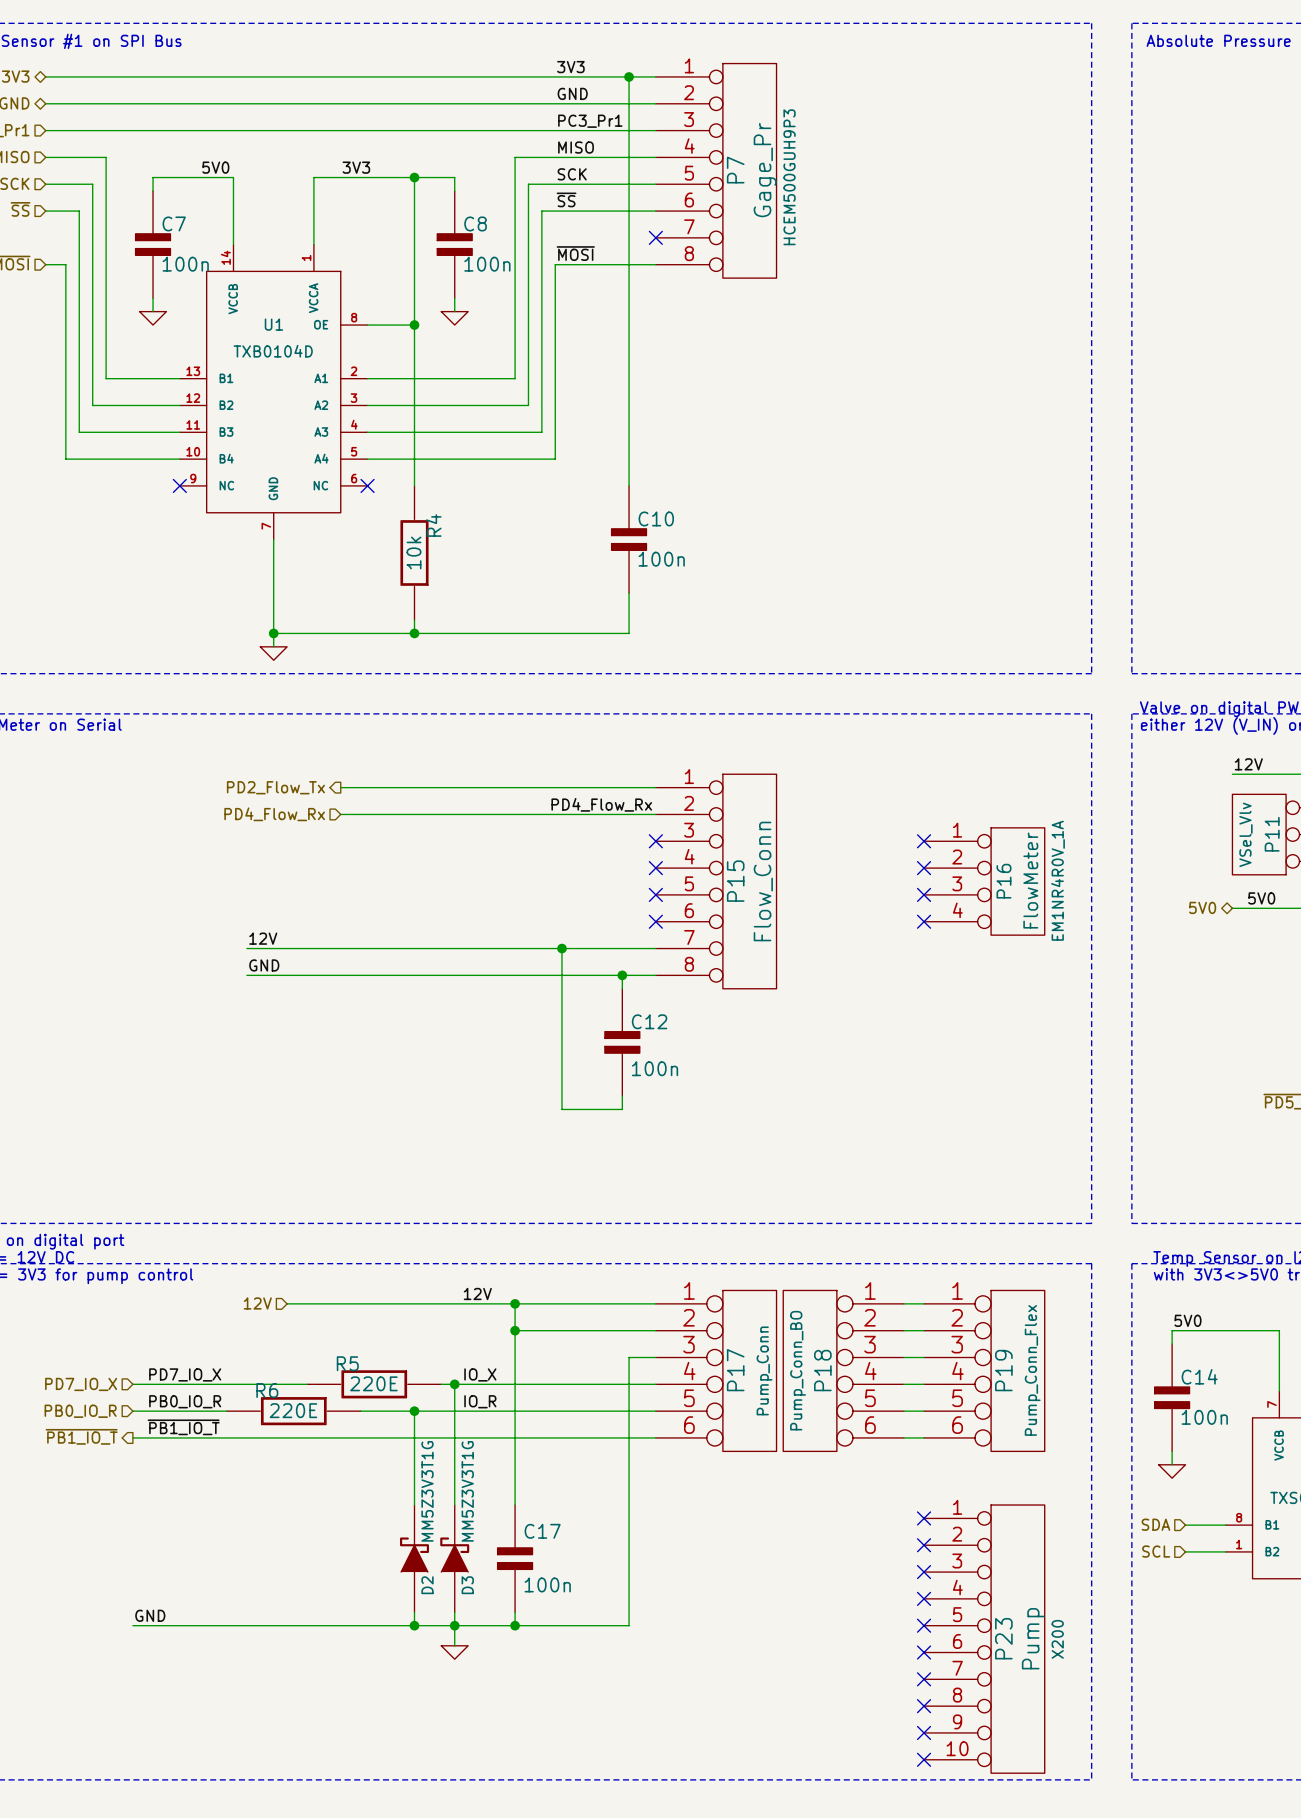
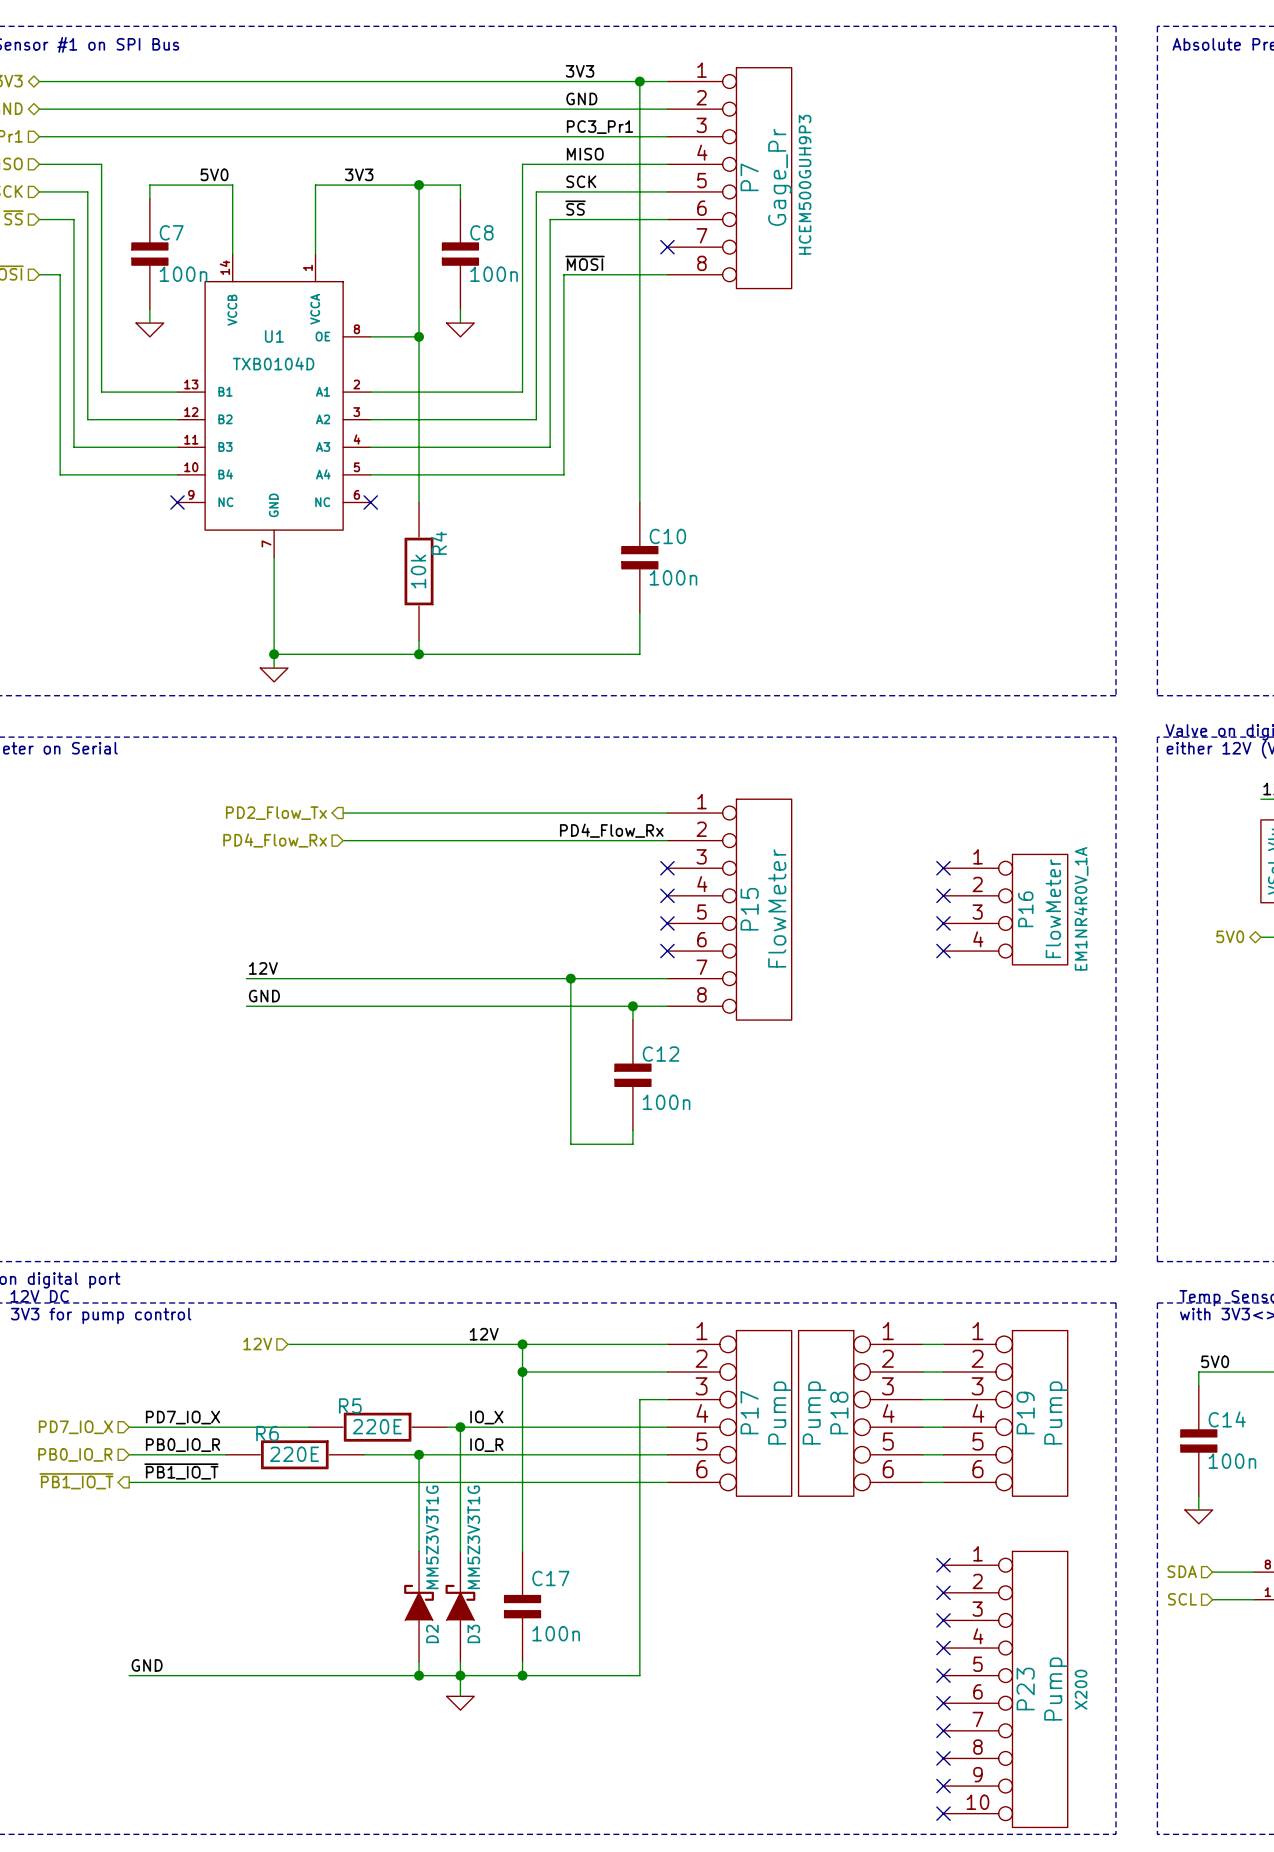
P15 value: Flow_Conn (763, 881) -> FlowMeter (777, 908)
P17 value: Pump_Conn (764, 1370) -> Pump (780, 1413)
P18 value: Pump_Conn_BO (798, 1370) -> Pump (814, 1413)
P19 value: Pump_Conn_Flex (1032, 1370) -> Pump (1056, 1413)

